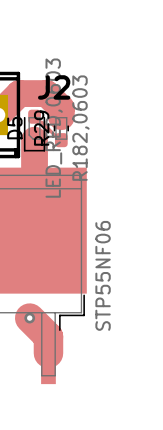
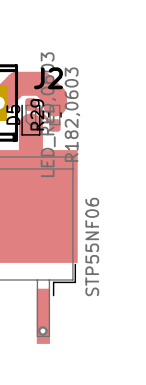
track: (29, 318) (48, 336) (48, 353) -> none
via position: (29, 318) -> (42, 331)

